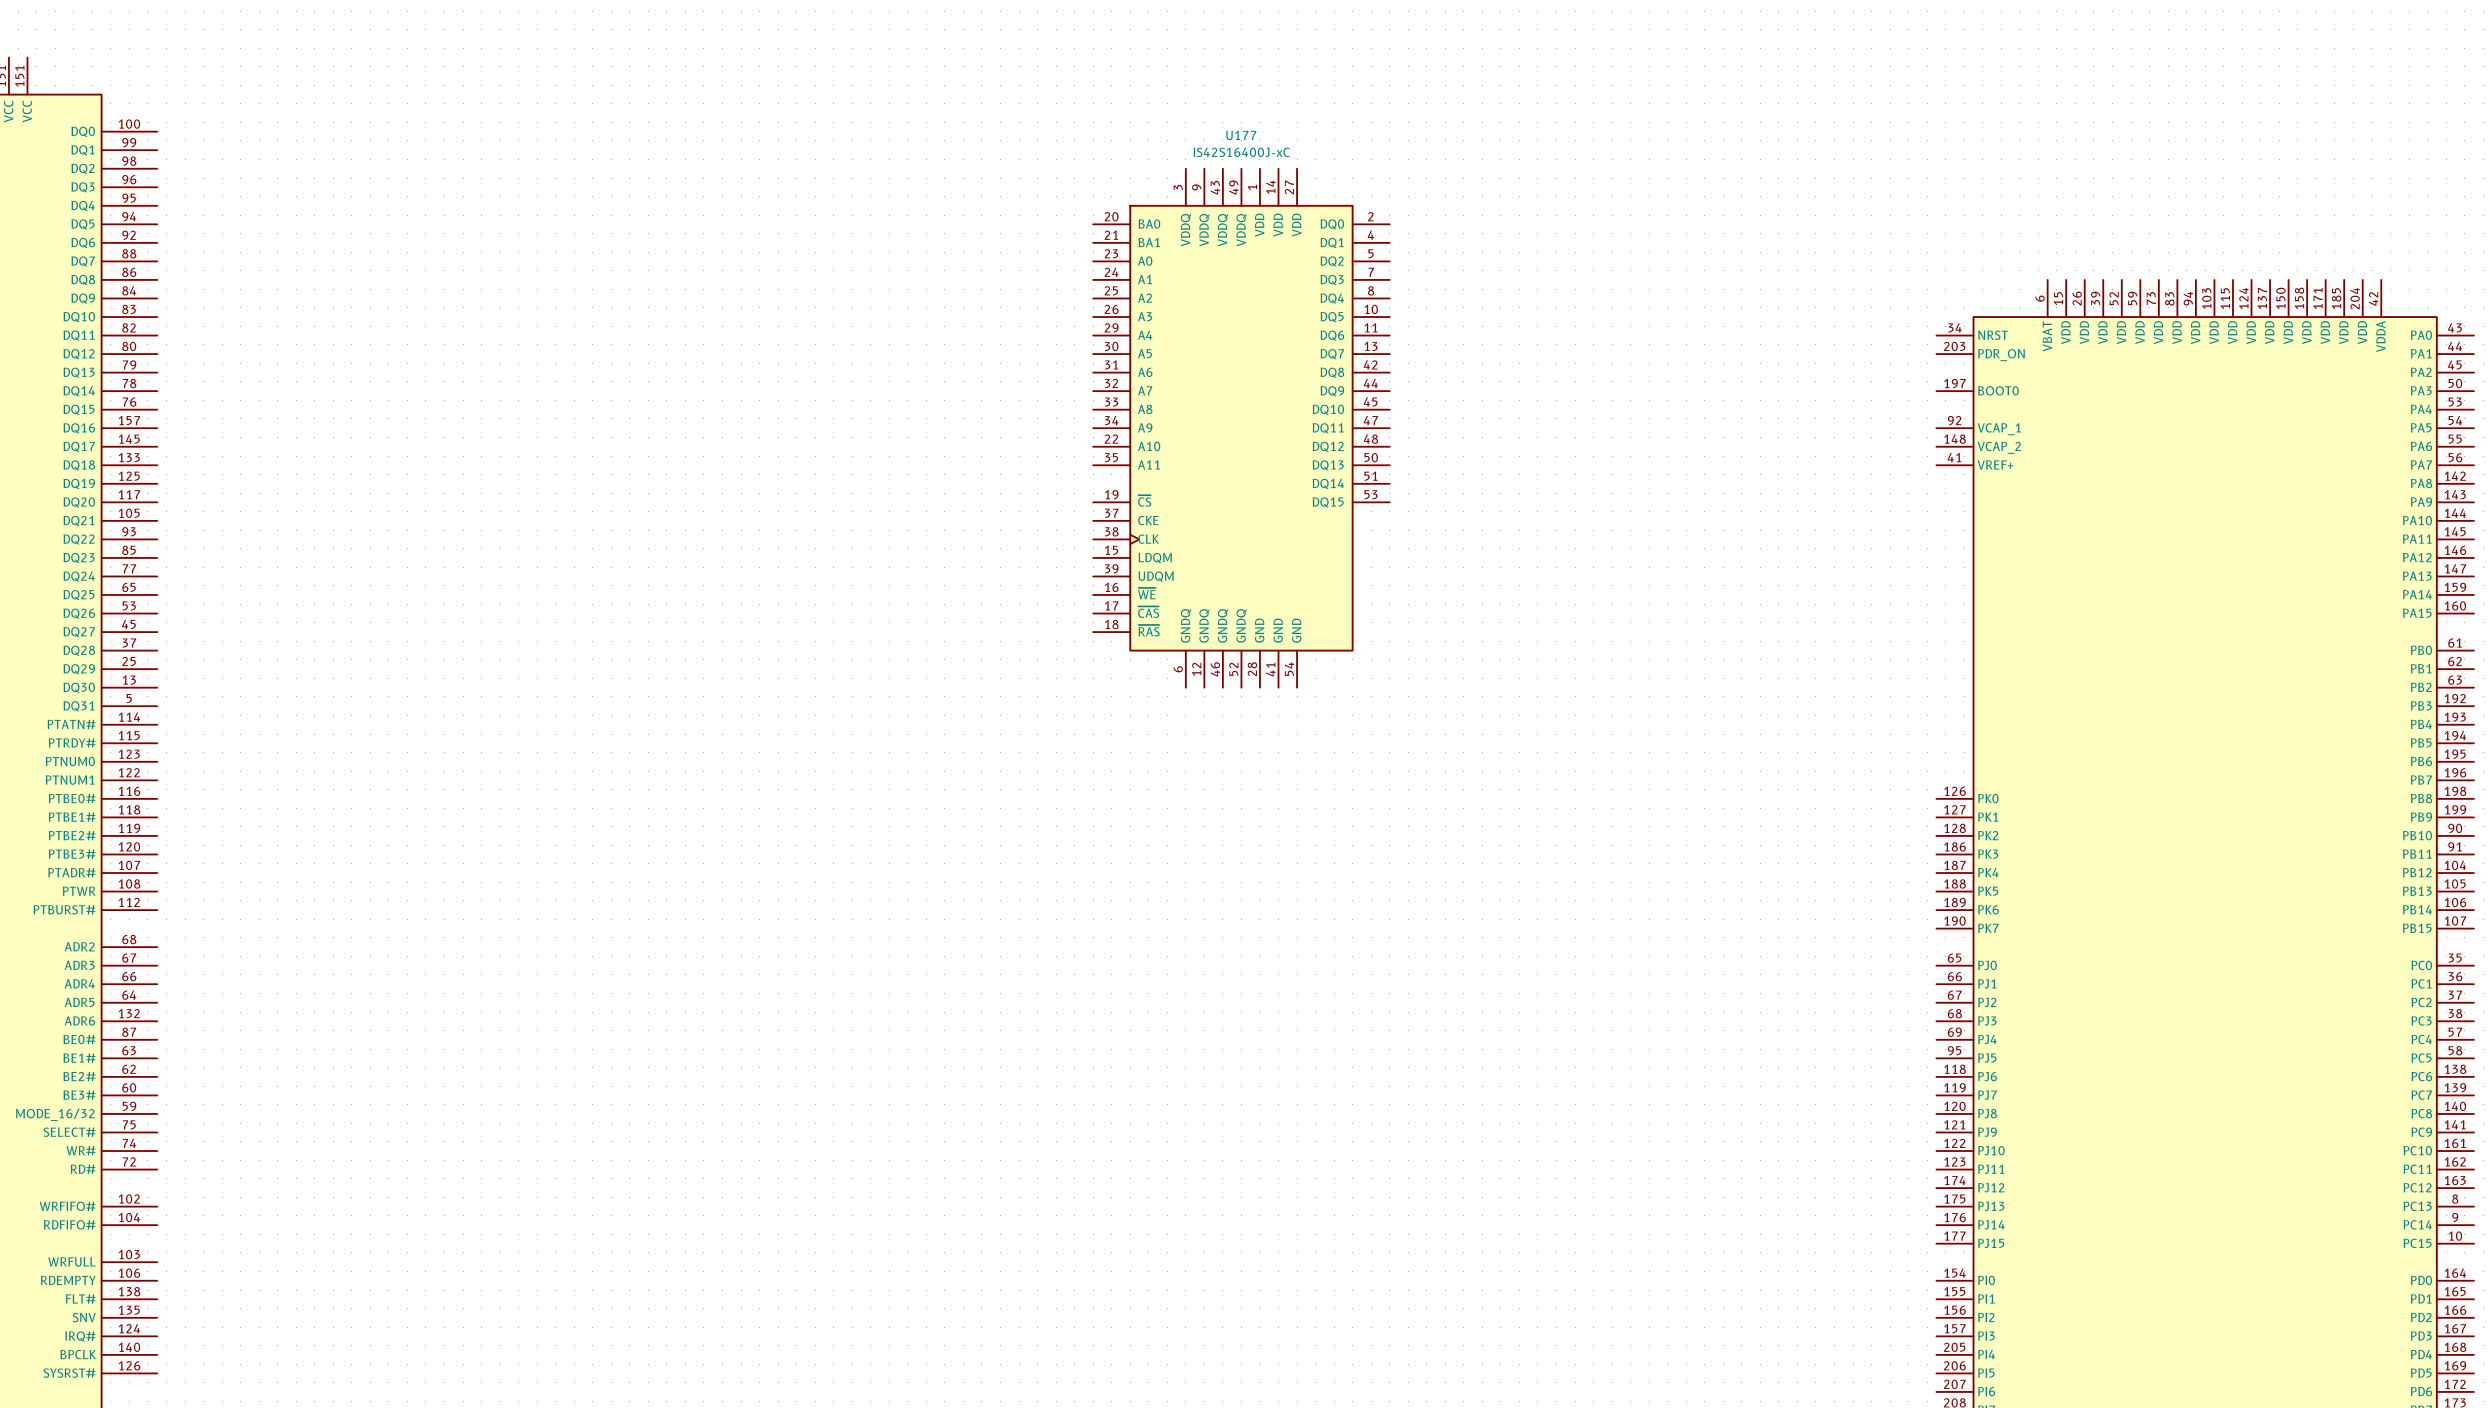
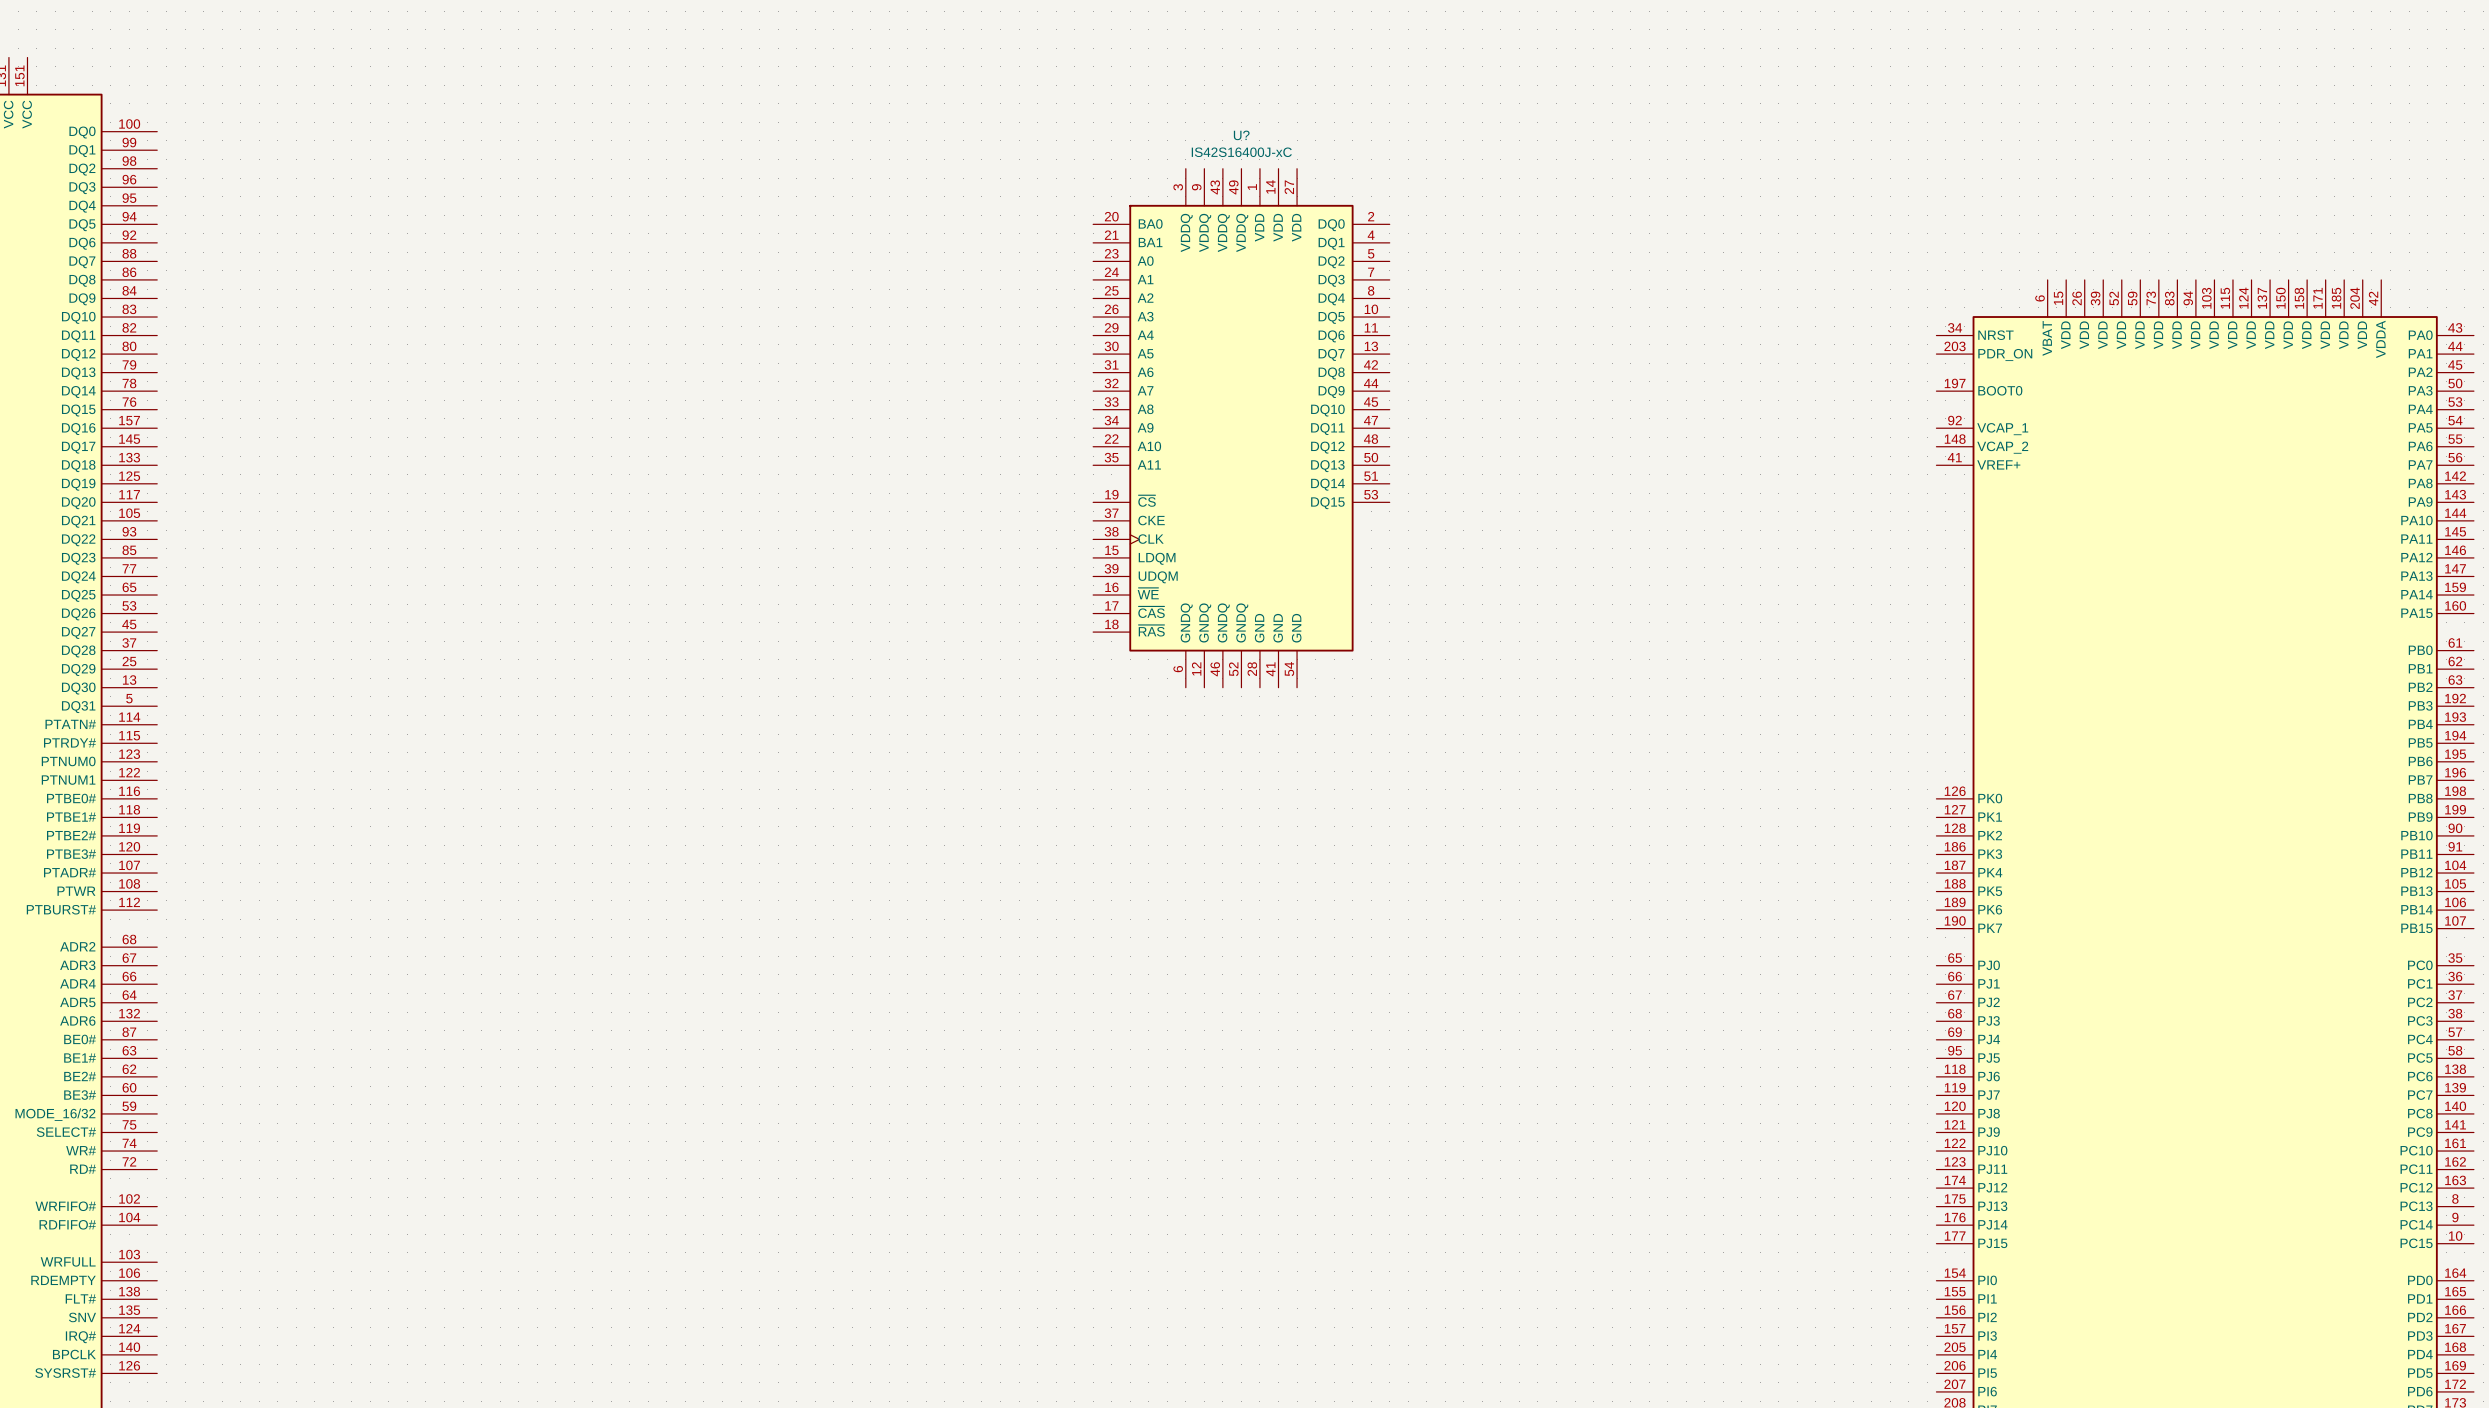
U177 name: U177 (1241, 135) -> U? (1241, 135)

